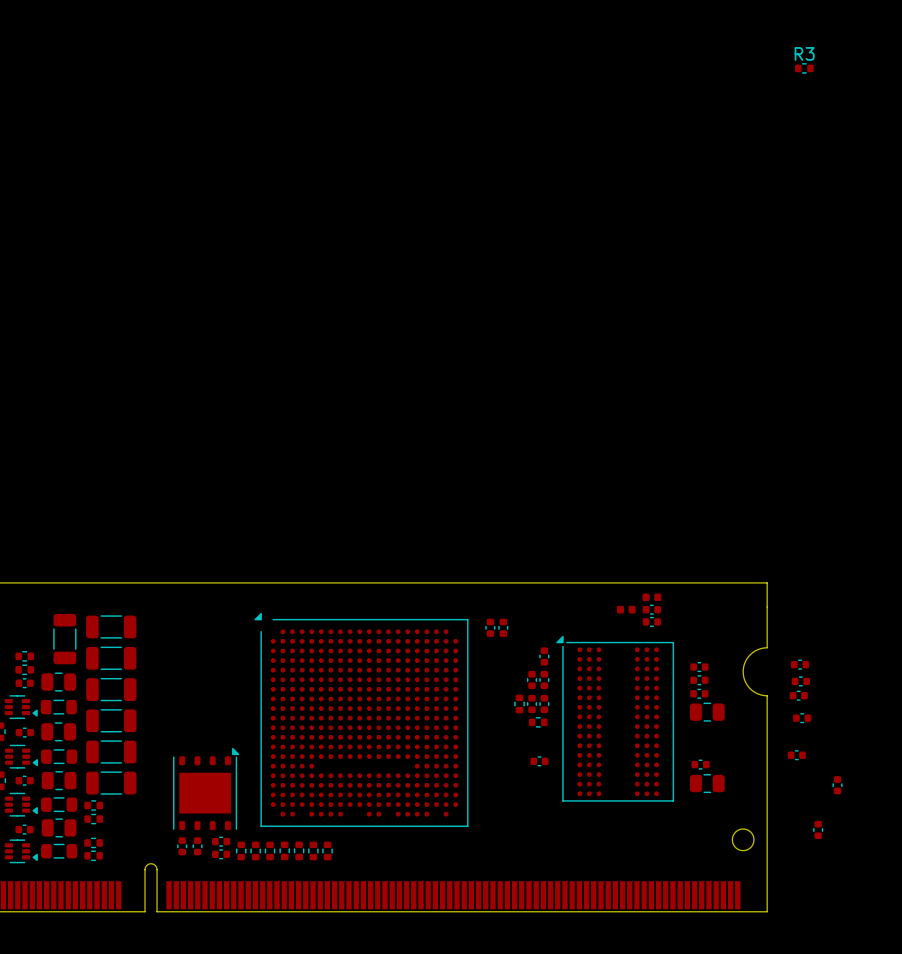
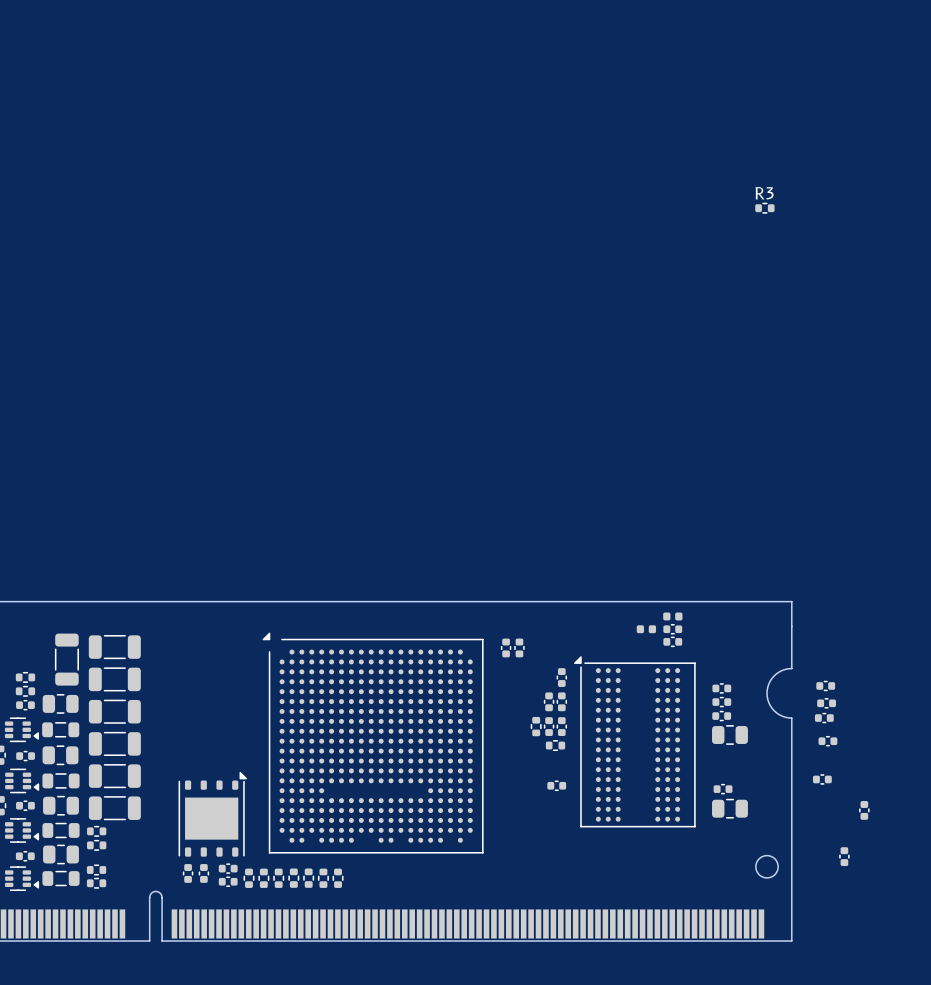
R3 position: (804, 68) -> (764, 208)

